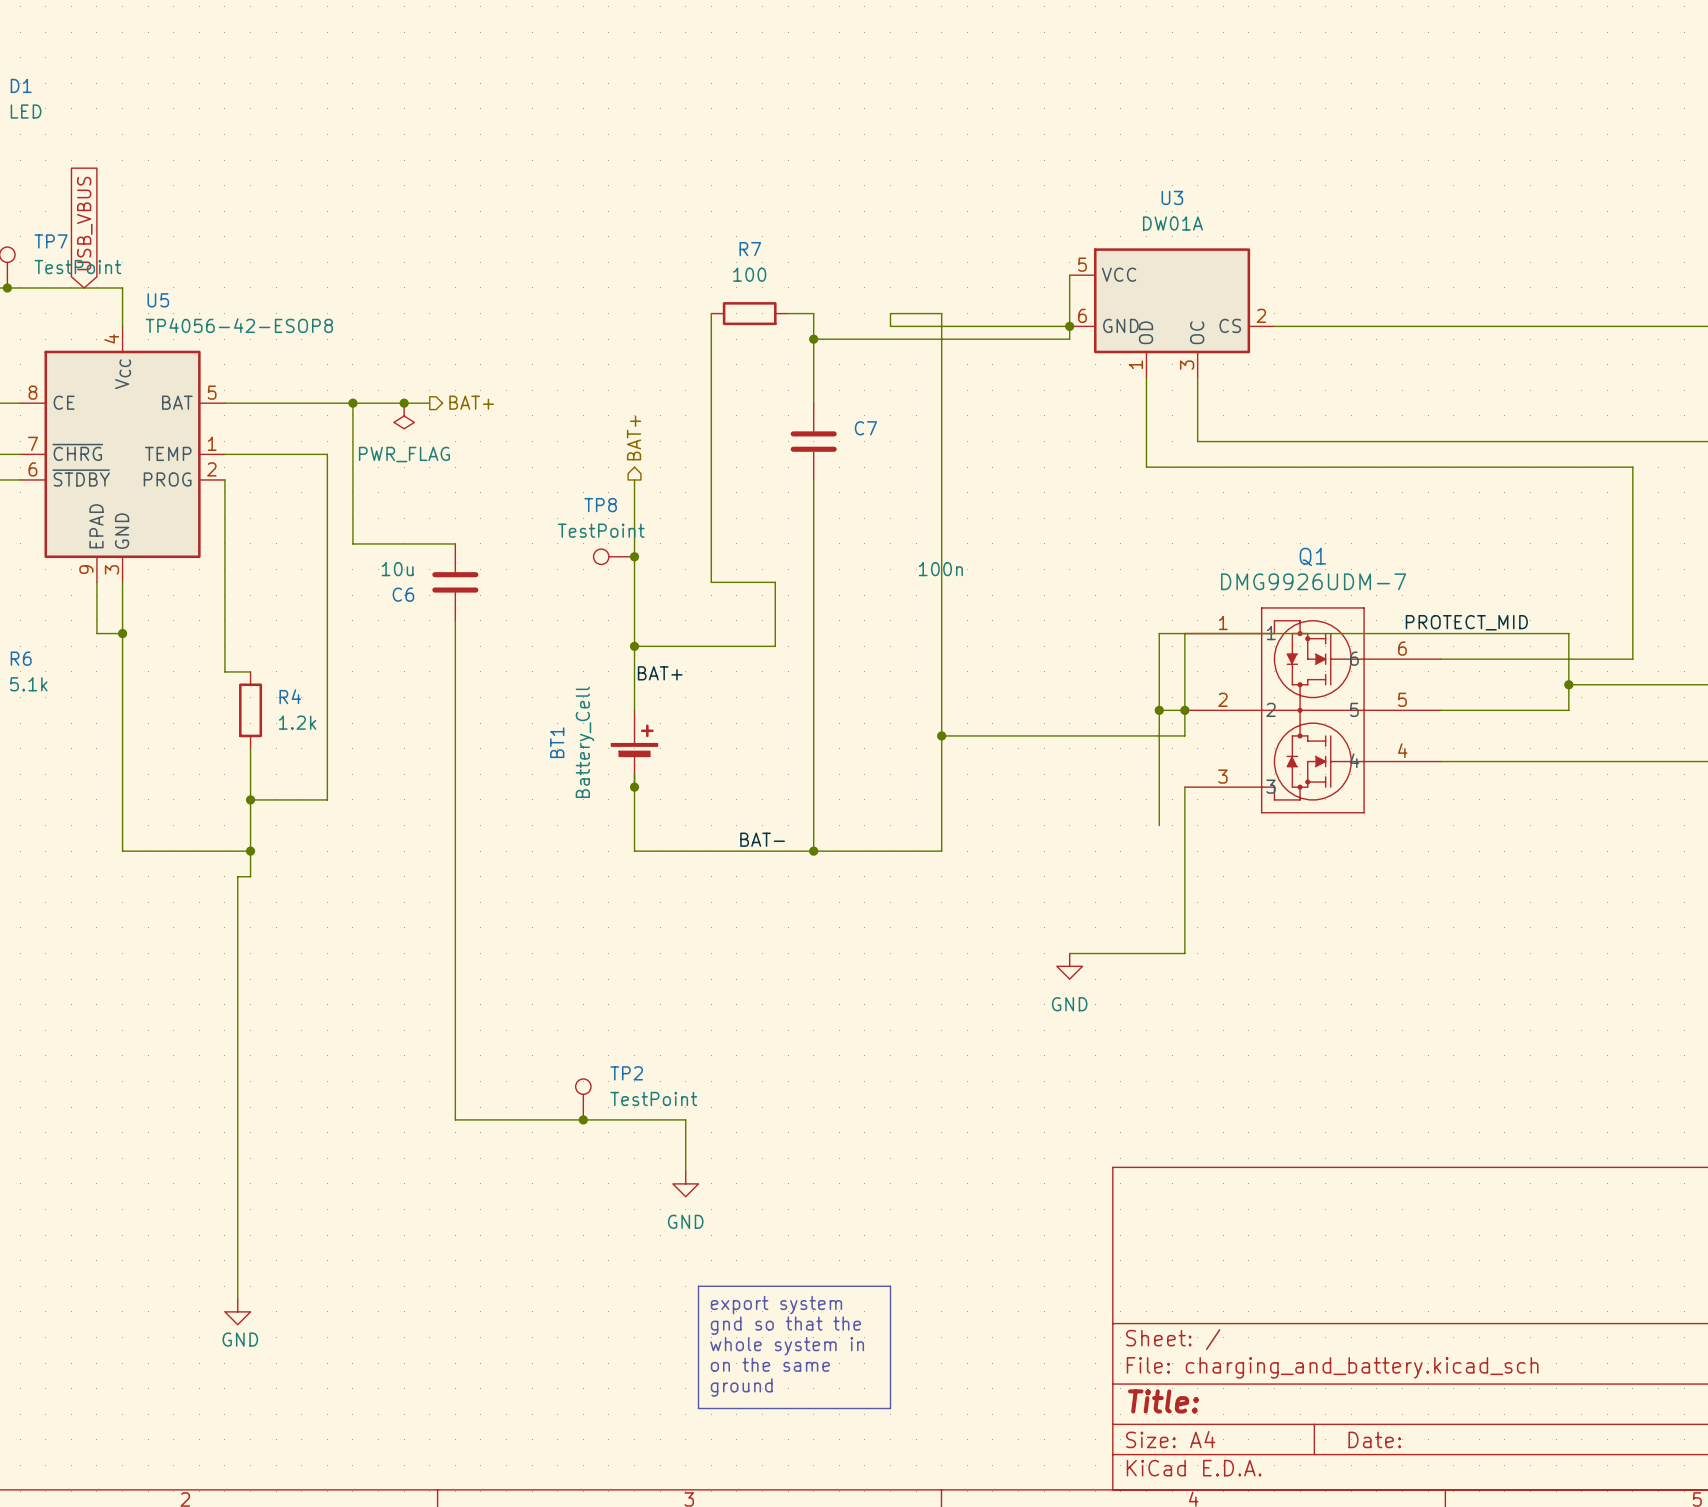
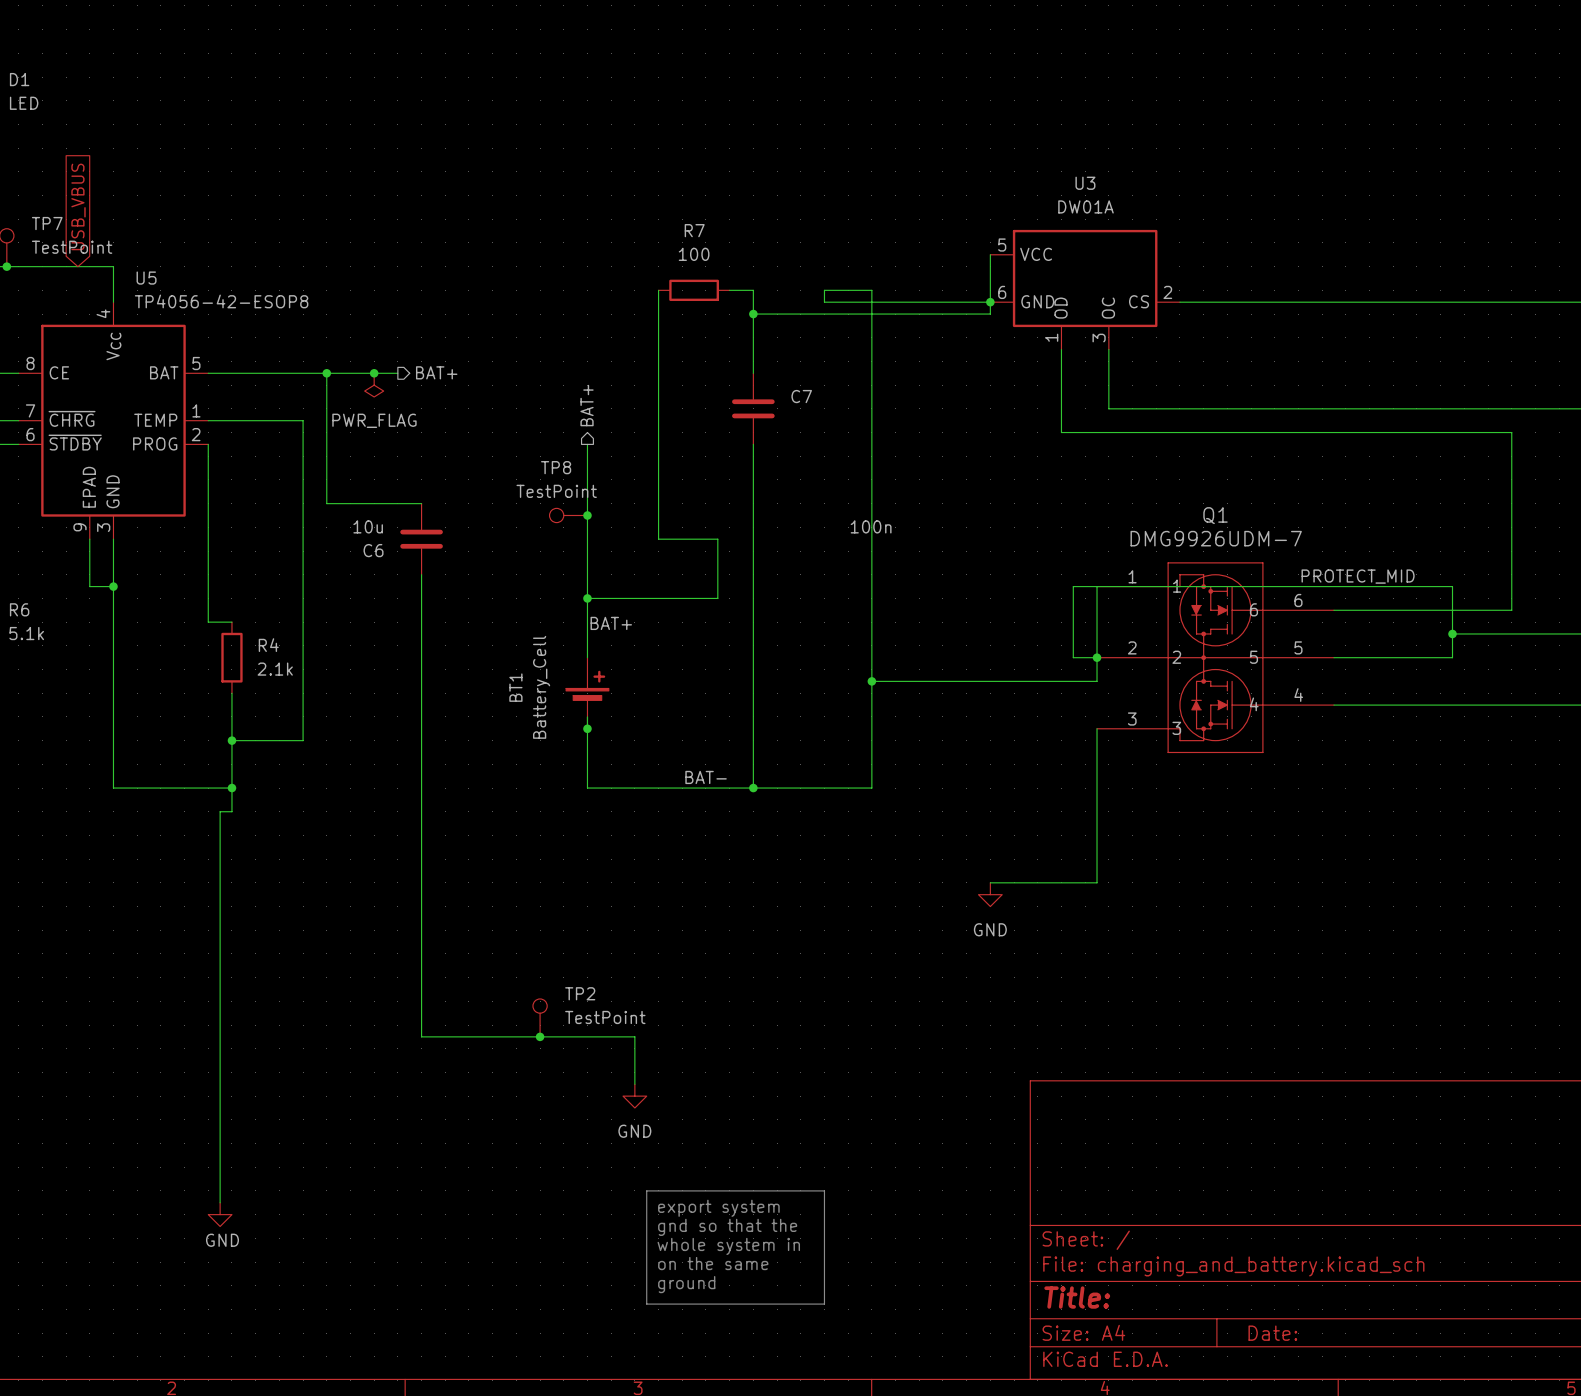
wire: (1159, 710) (1159, 825) -> none
junction: (1159, 710) -> none
R4 value: 1.2k (297, 722) -> 2.1k (275, 669)

